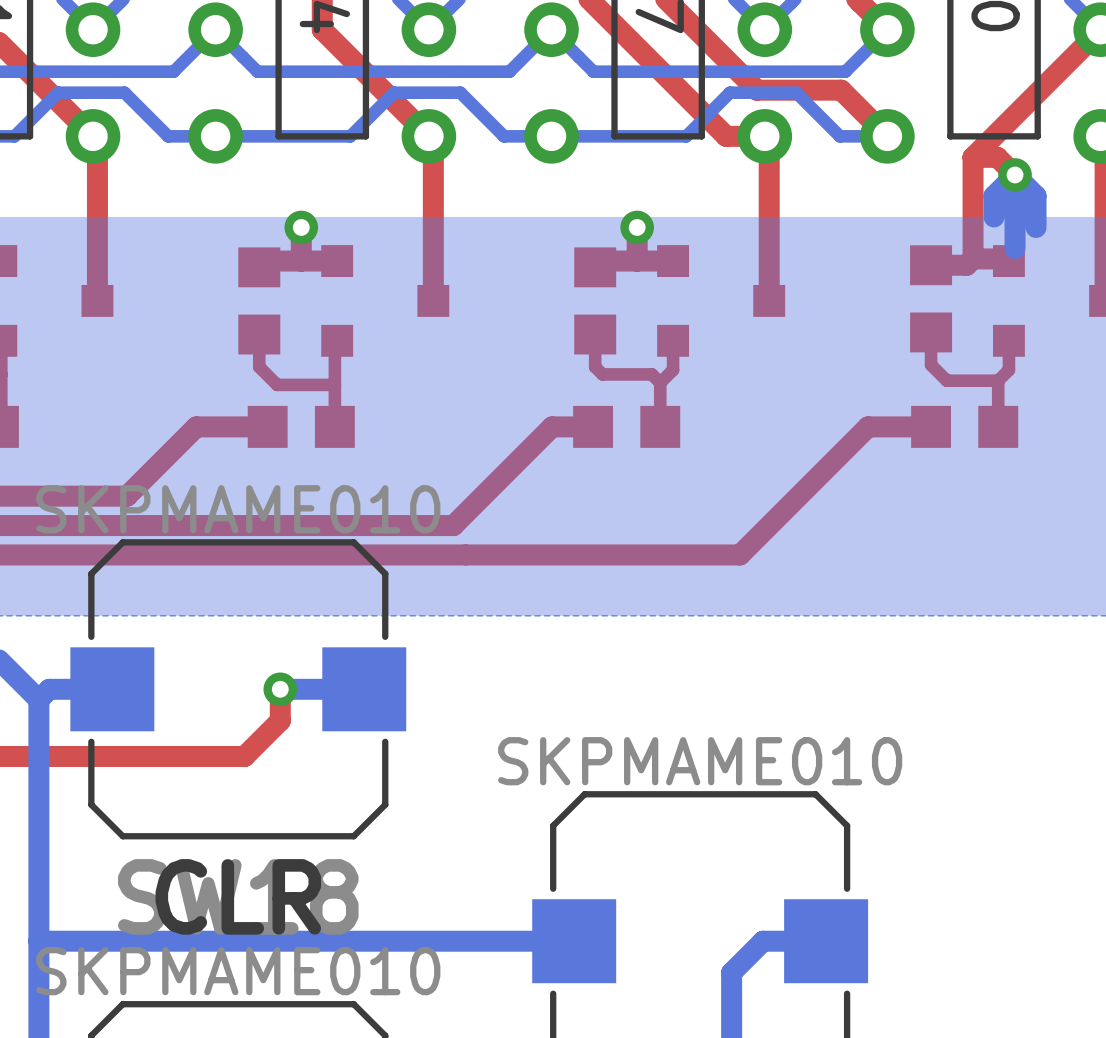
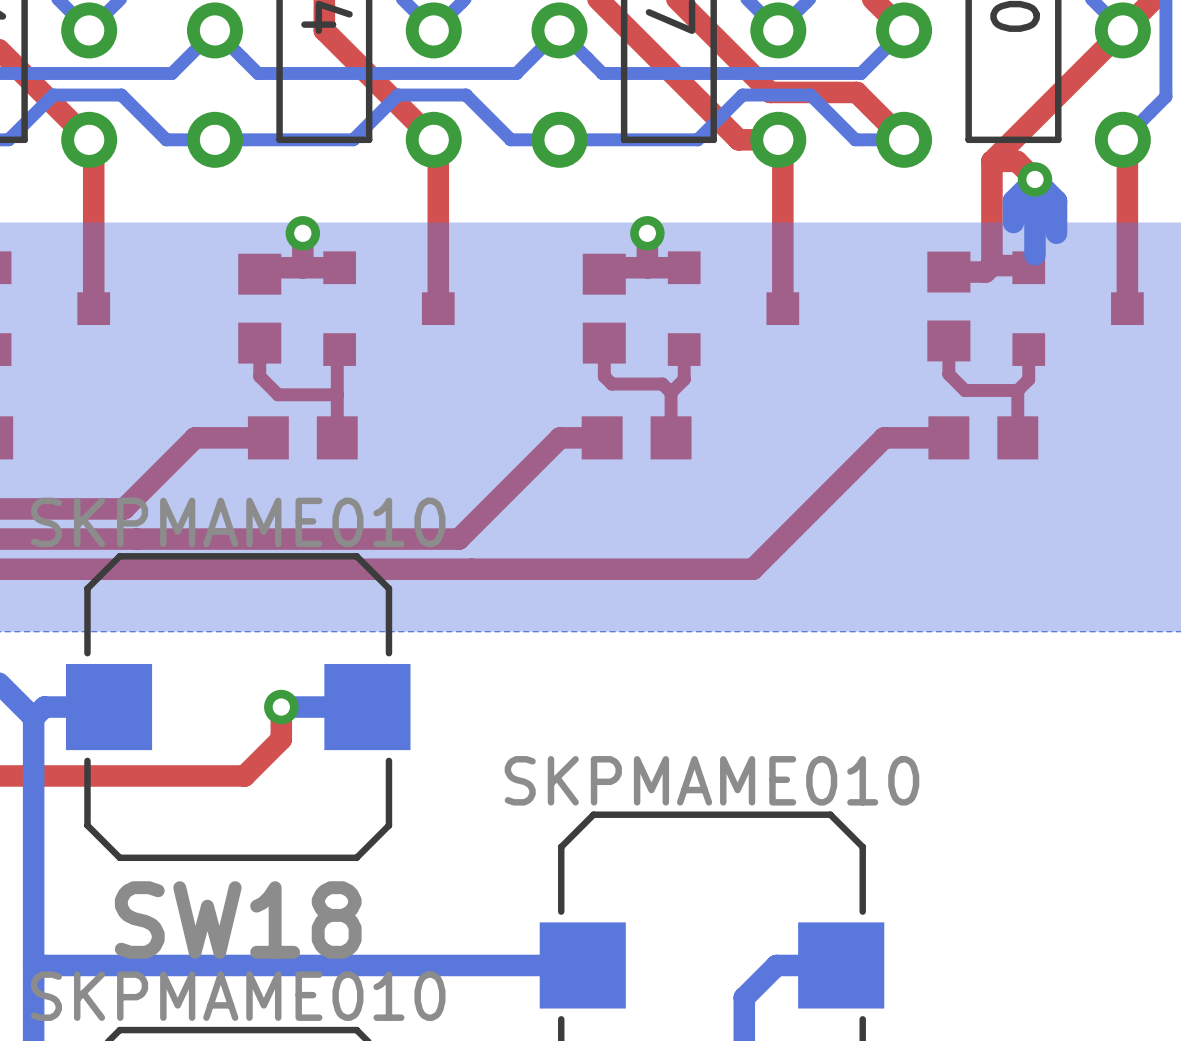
text: CLR (238, 896) -> none

